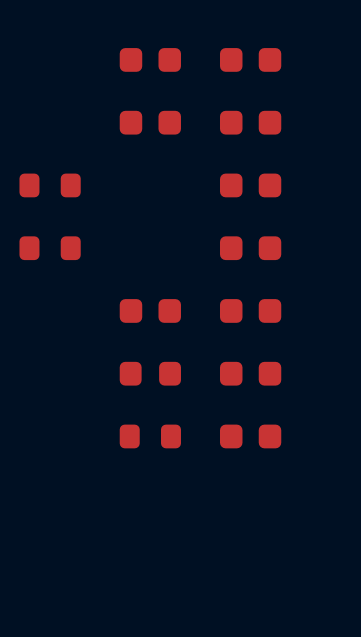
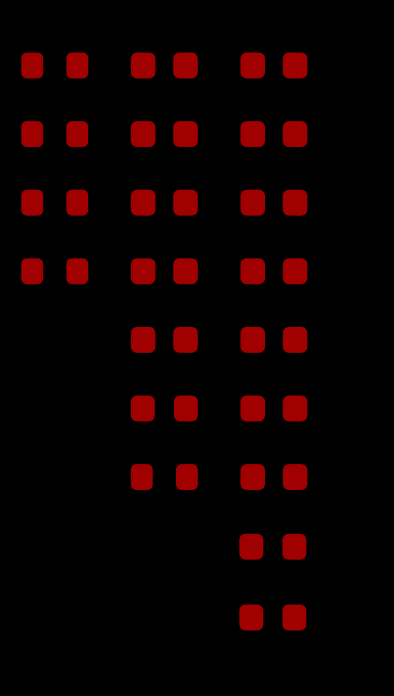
part: none -> (54, 65)
part: none -> (54, 134)
part: none -> (164, 202)
part: none -> (164, 271)
part: none -> (272, 546)
part: none -> (272, 617)

